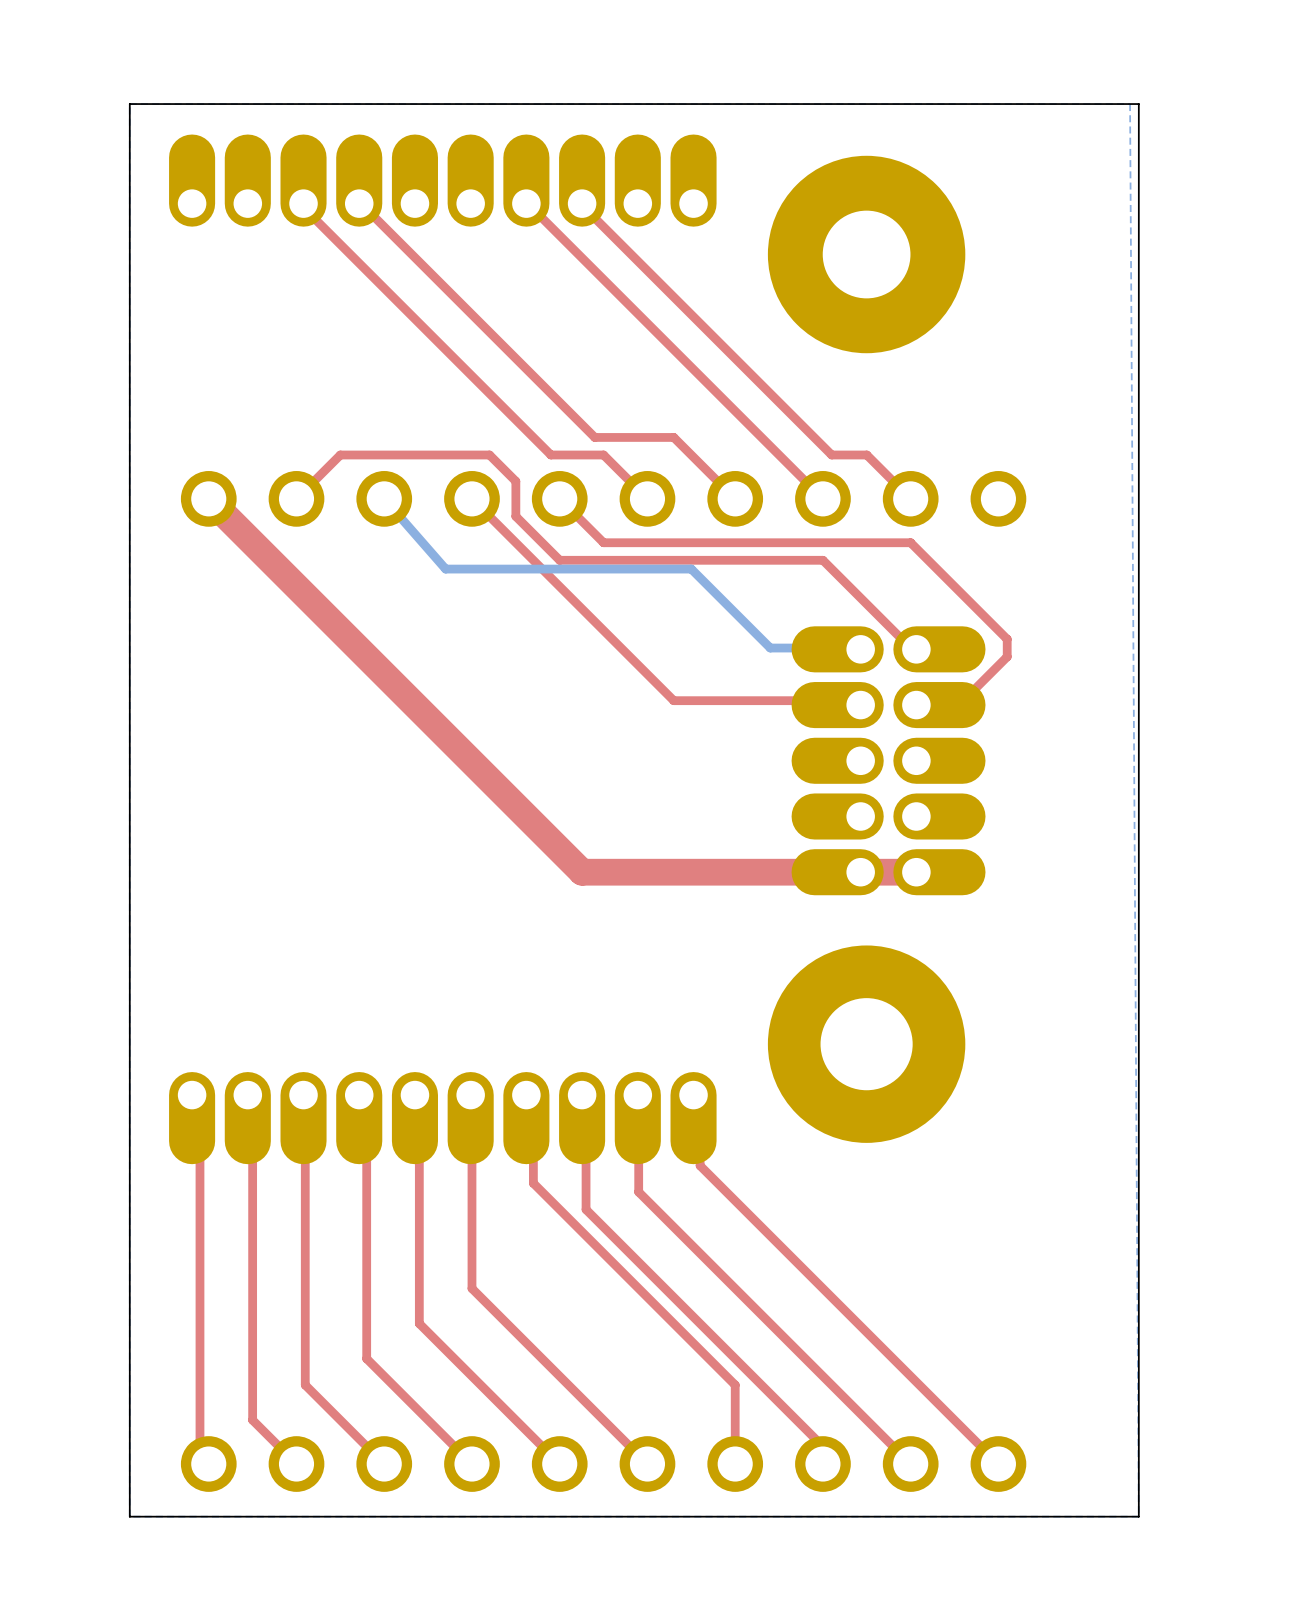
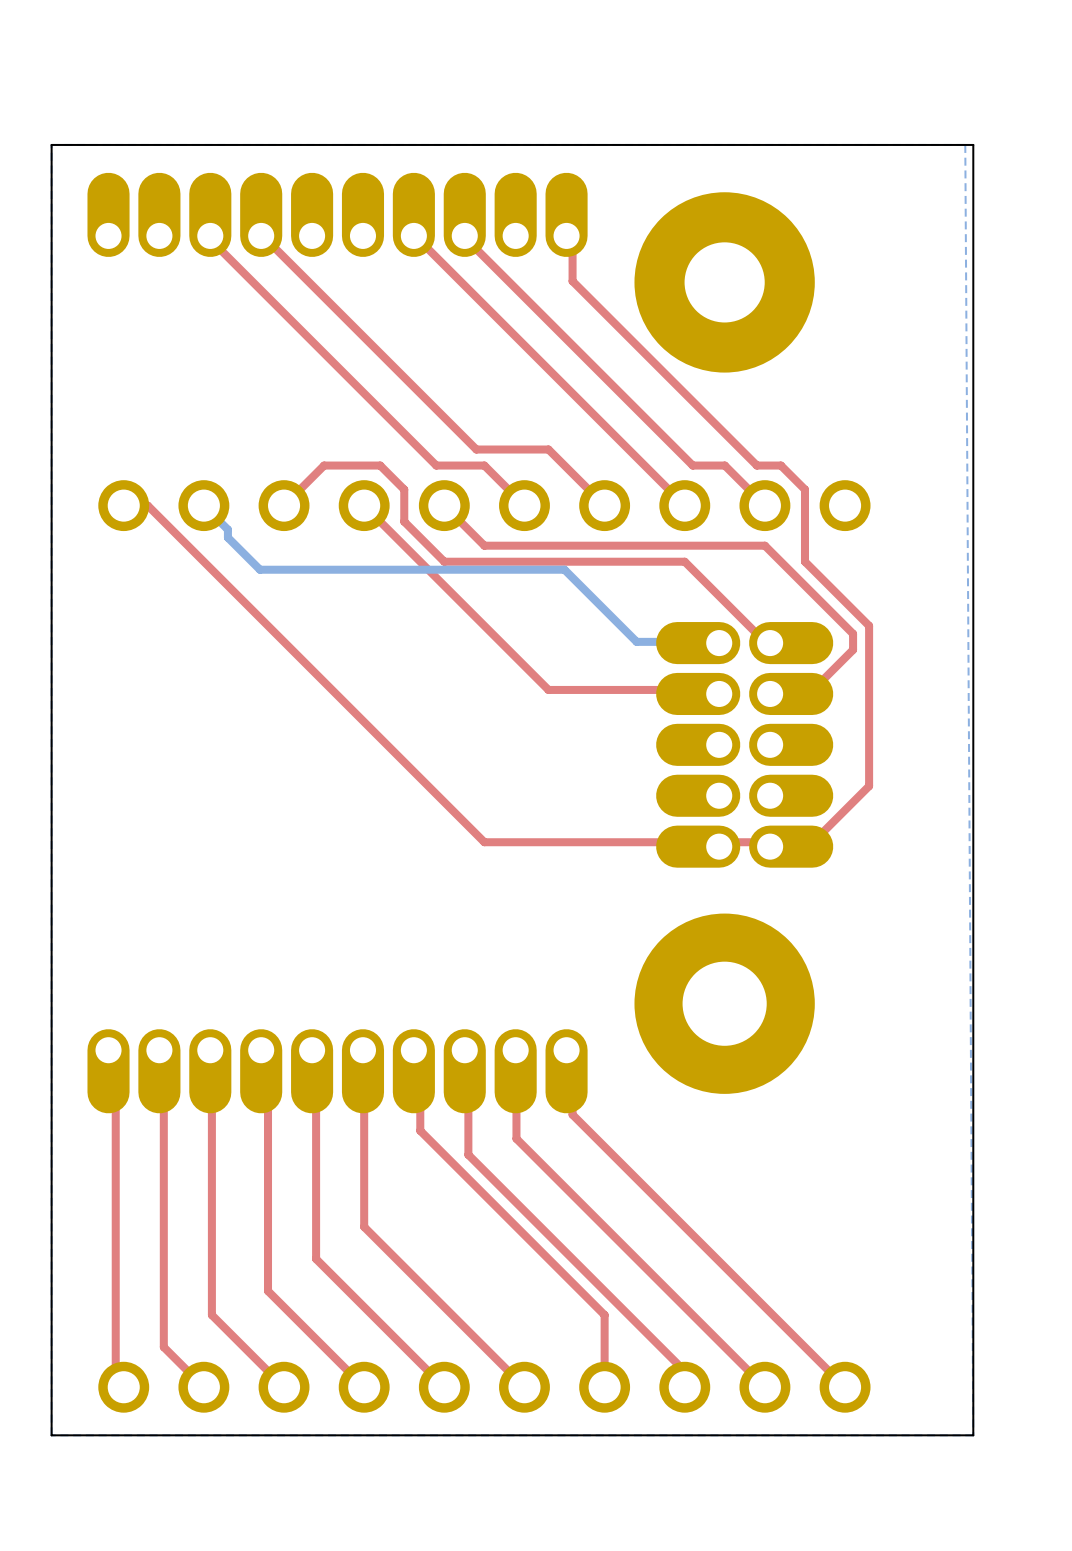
top track: (428, 455) (340, 455) (296, 498) -> (324, 465) (284, 505)
top track: (208, 498) (582, 872) (916, 872) -> (123, 505) (147, 505) (484, 842) (716, 842) (719, 846) (724, 842) (764, 842) (770, 846) (772, 842) (813, 842) (869, 786) (869, 625) (804, 561) (804, 489) (780, 465) (756, 465) (572, 281) (572, 241) (566, 235)
bottom track: (384, 498) (445, 569) -> (203, 505) (227, 529) (227, 537) (259, 569) (340, 569)

